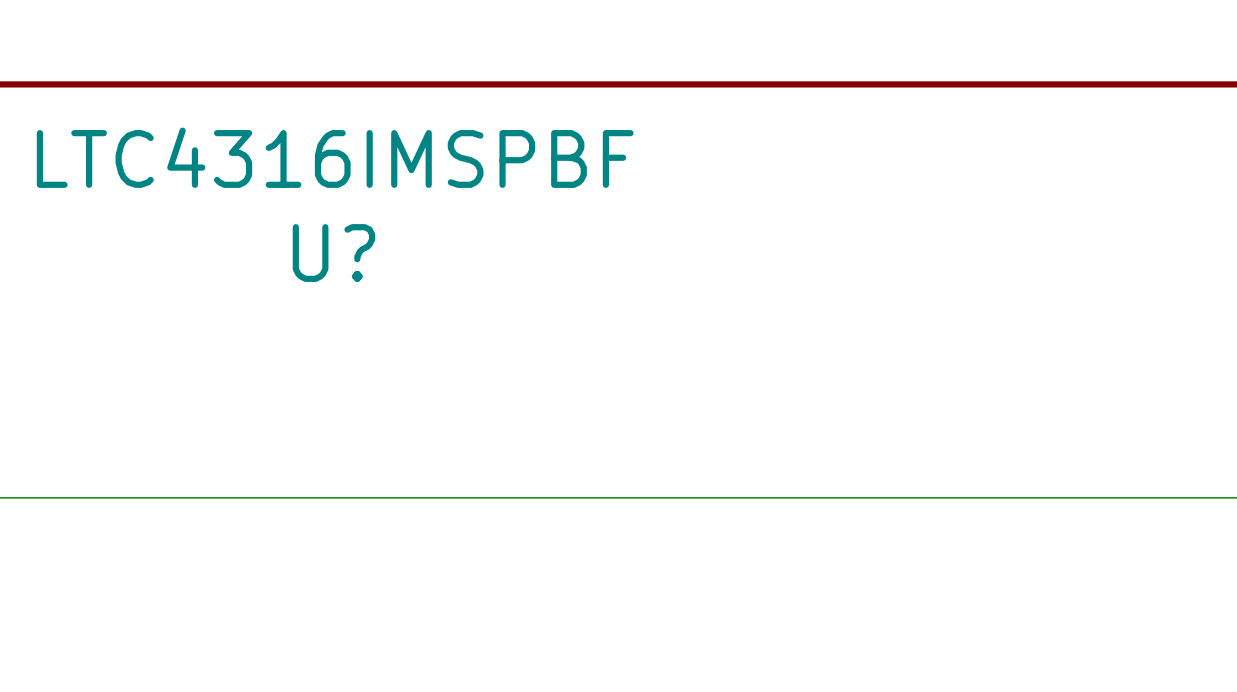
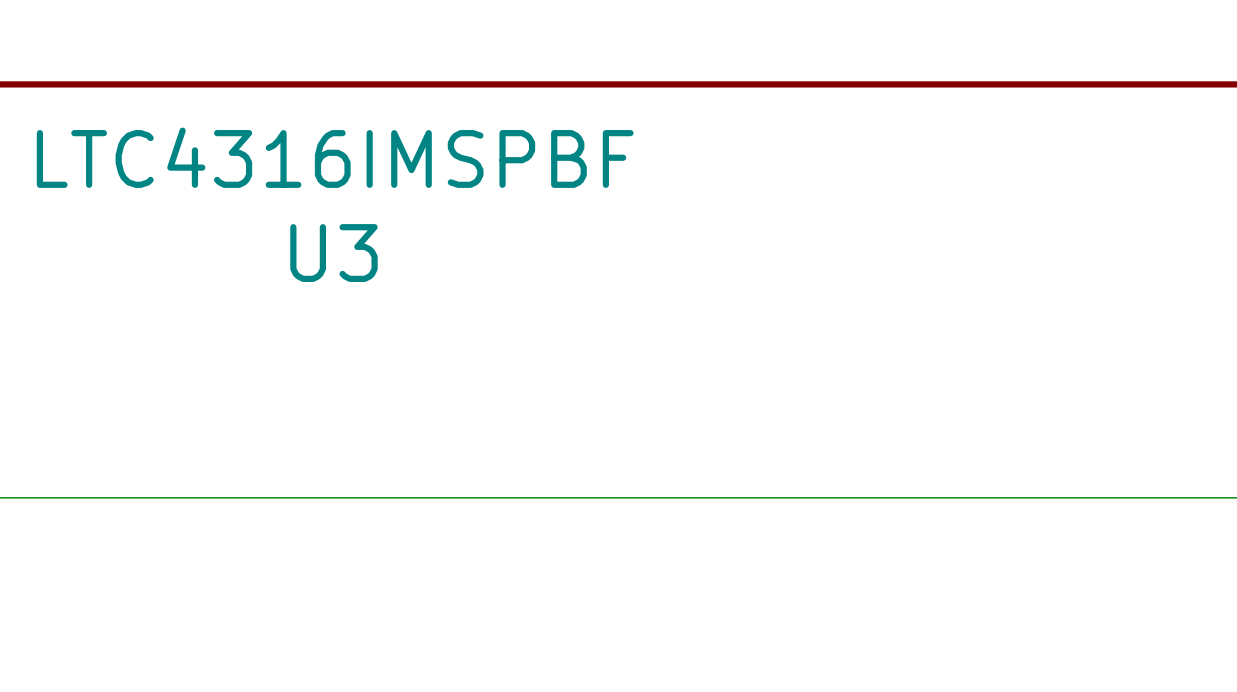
U? name: U? (333, 253) -> U3 (333, 253)

